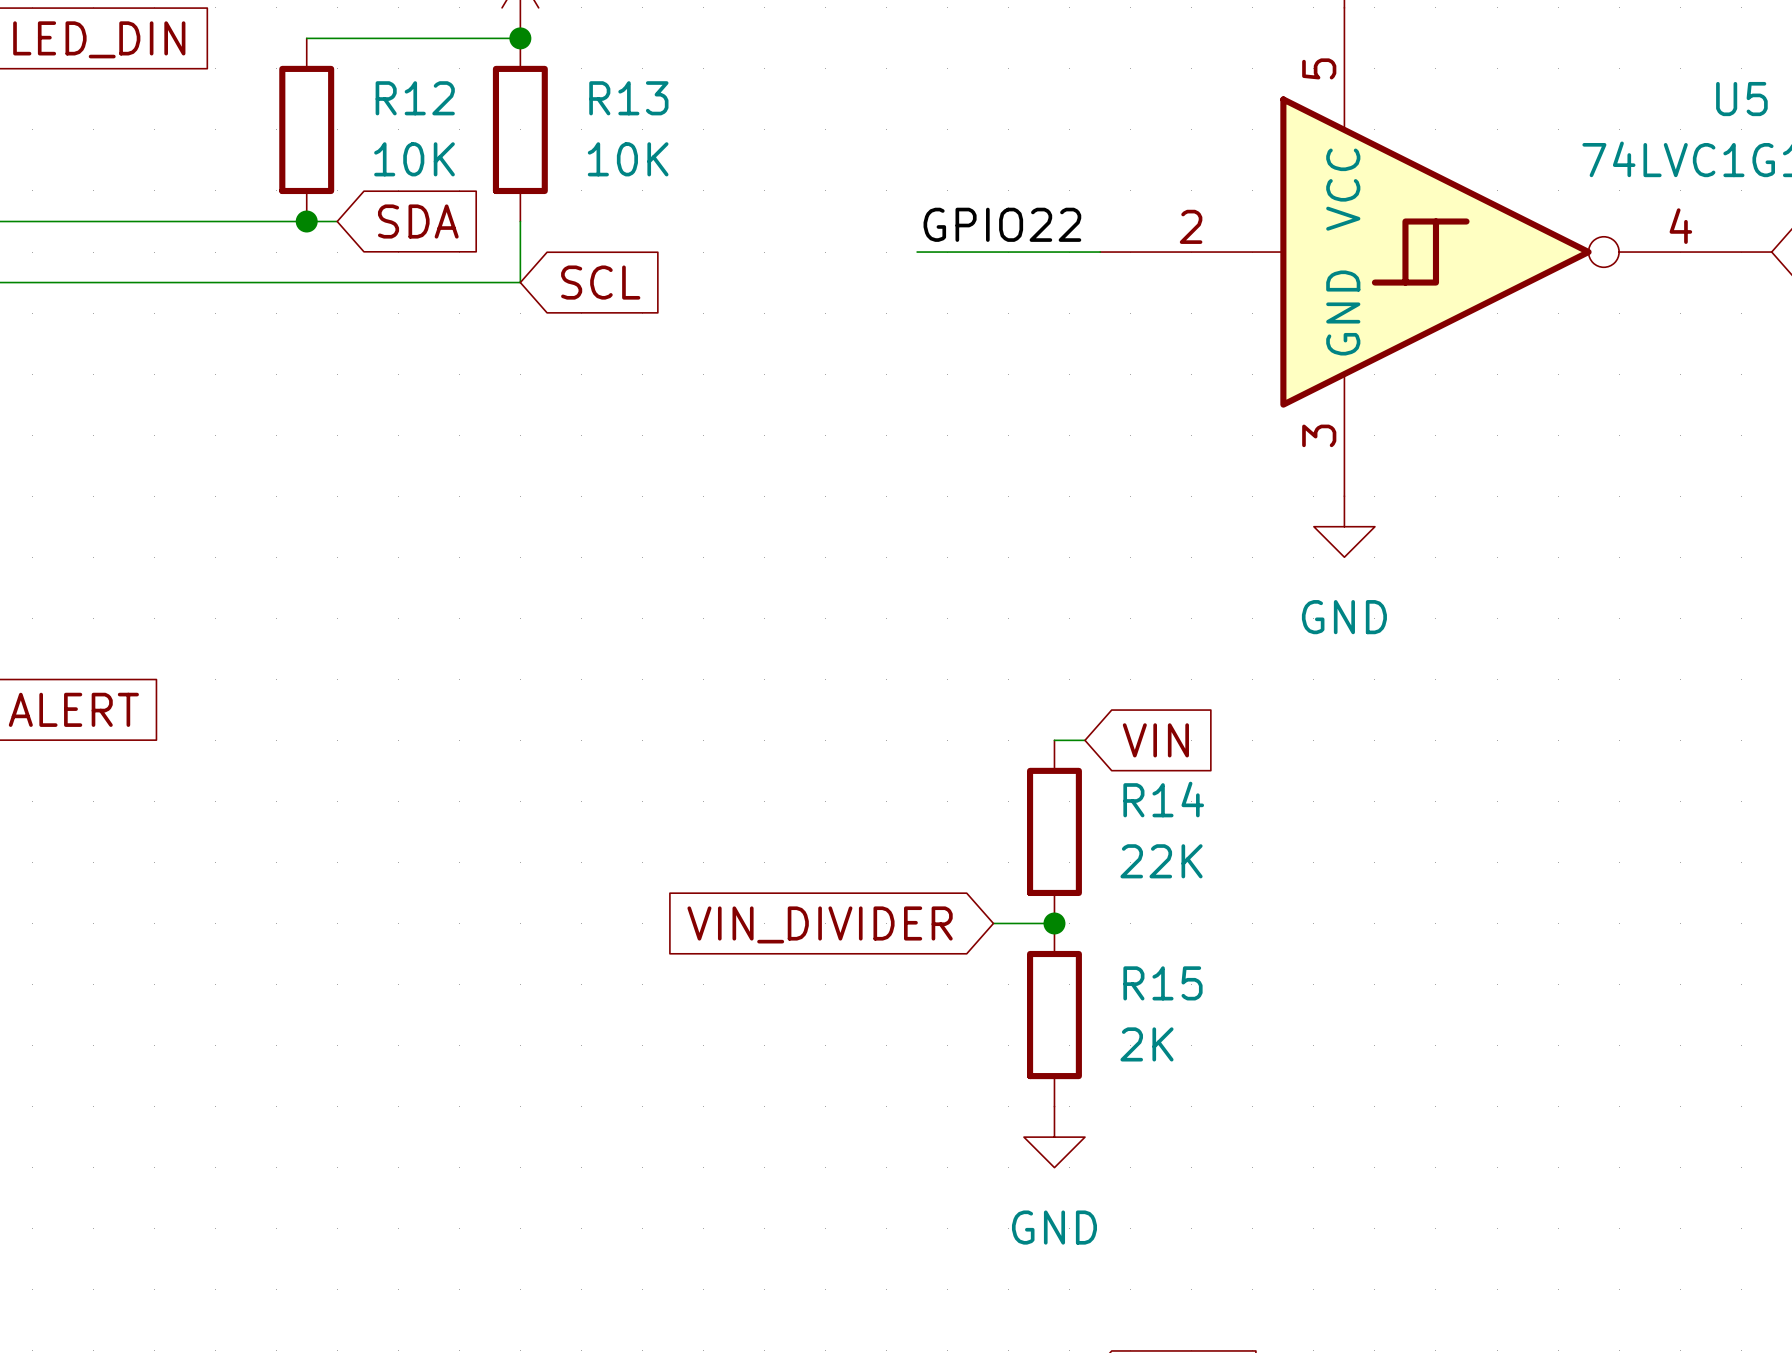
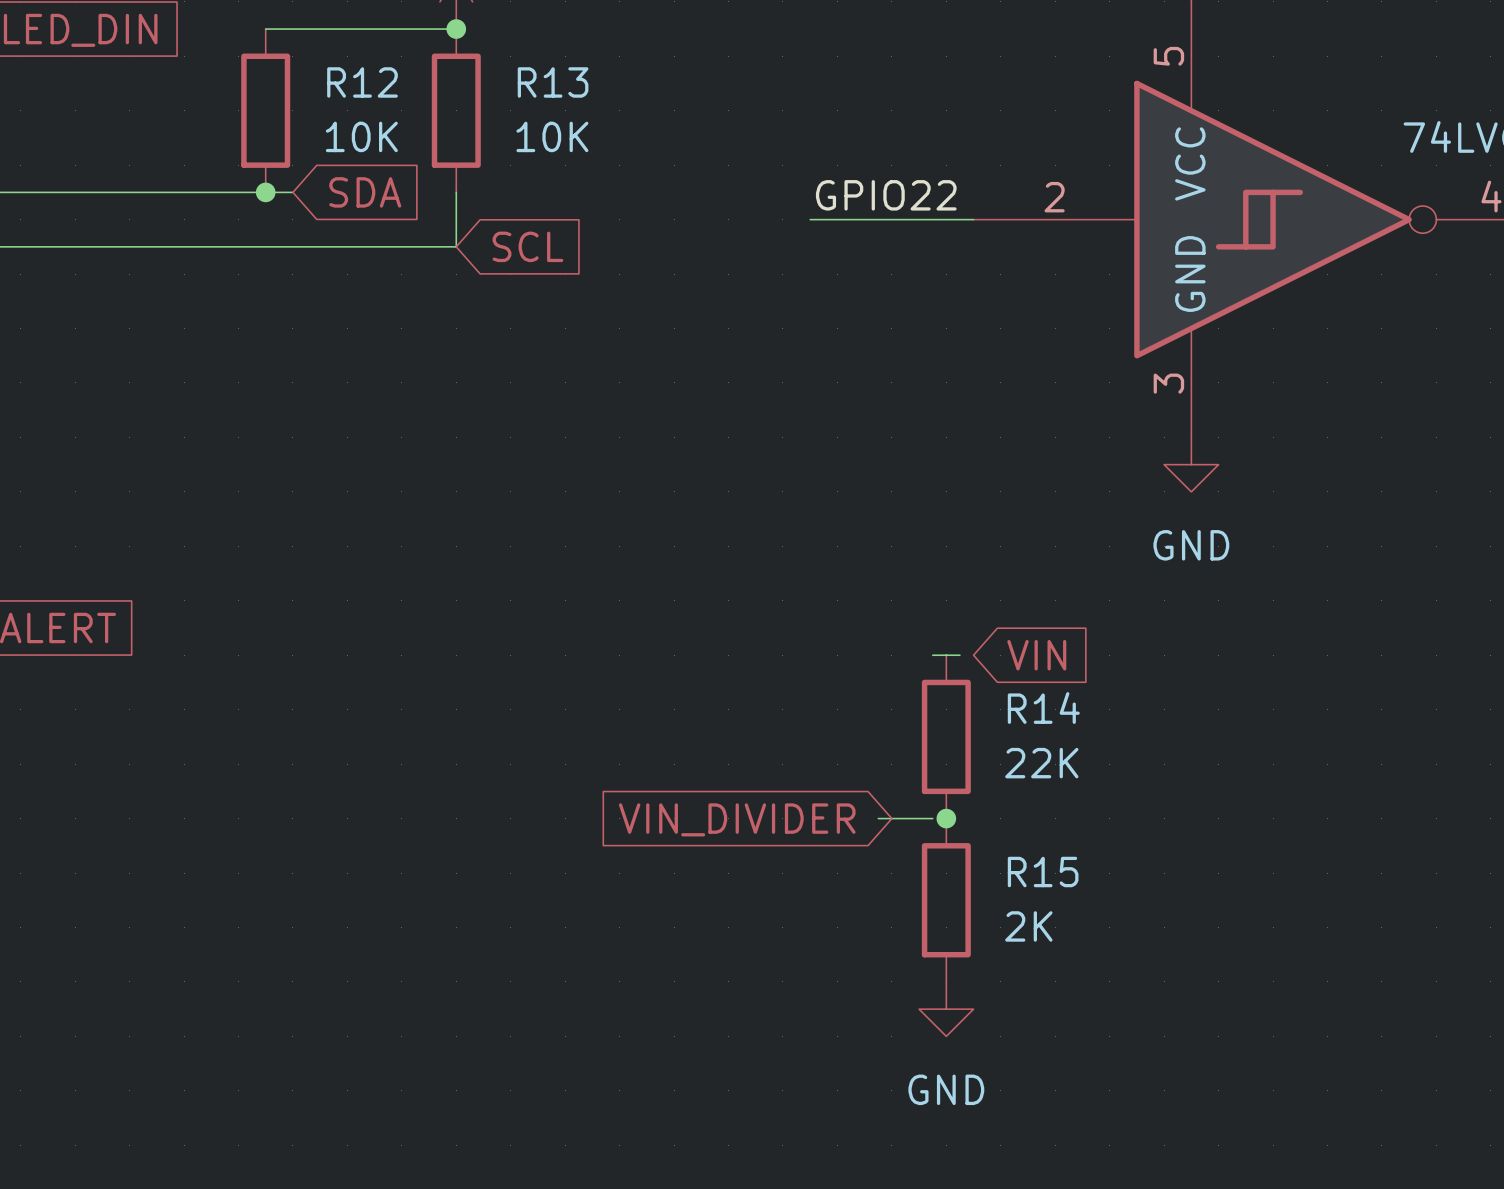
global label position: VIN (1155, 740) -> VIN (1036, 655)
R14 position: (1054, 831) -> (946, 736)
junction position: (1054, 923) -> (946, 818)
global label position: VIN_DIVIDER (820, 924) -> VIN_DIVIDER (737, 819)
R15 position: (1054, 1015) -> (946, 900)
power symbol position: GND (1054, 1137) -> GND (946, 1009)

